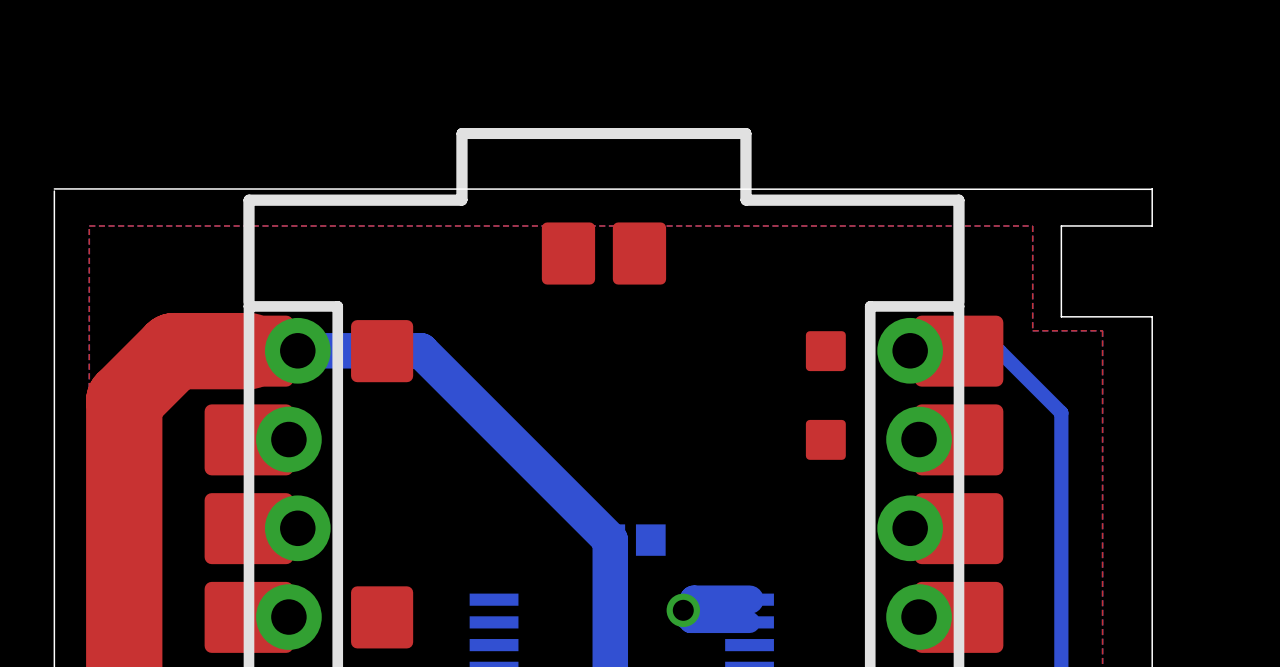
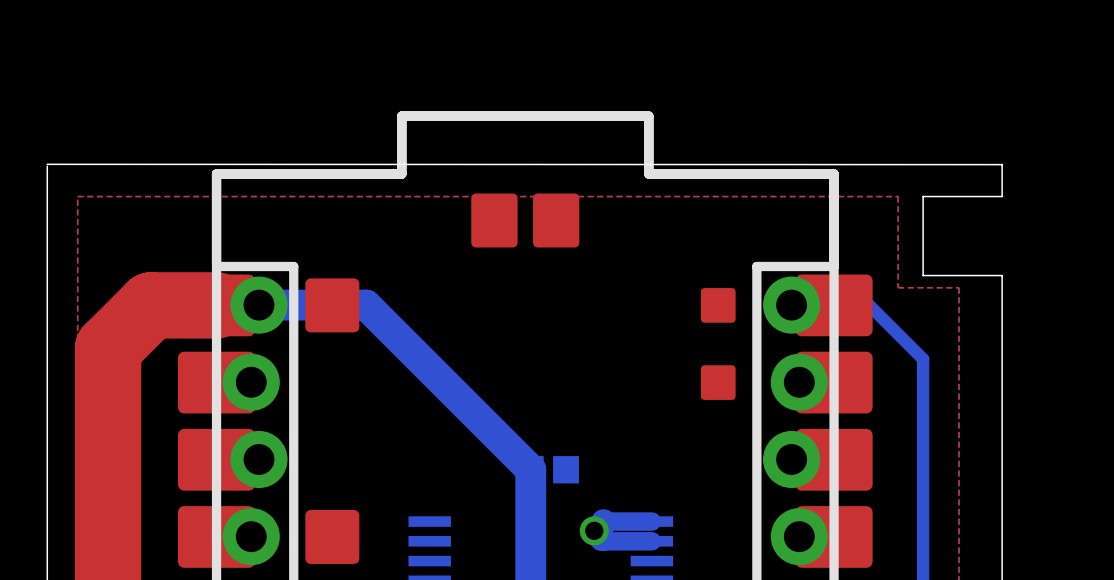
bottom track width: thick (693, 599) (749, 599) -> thin (603, 521) (651, 521)

